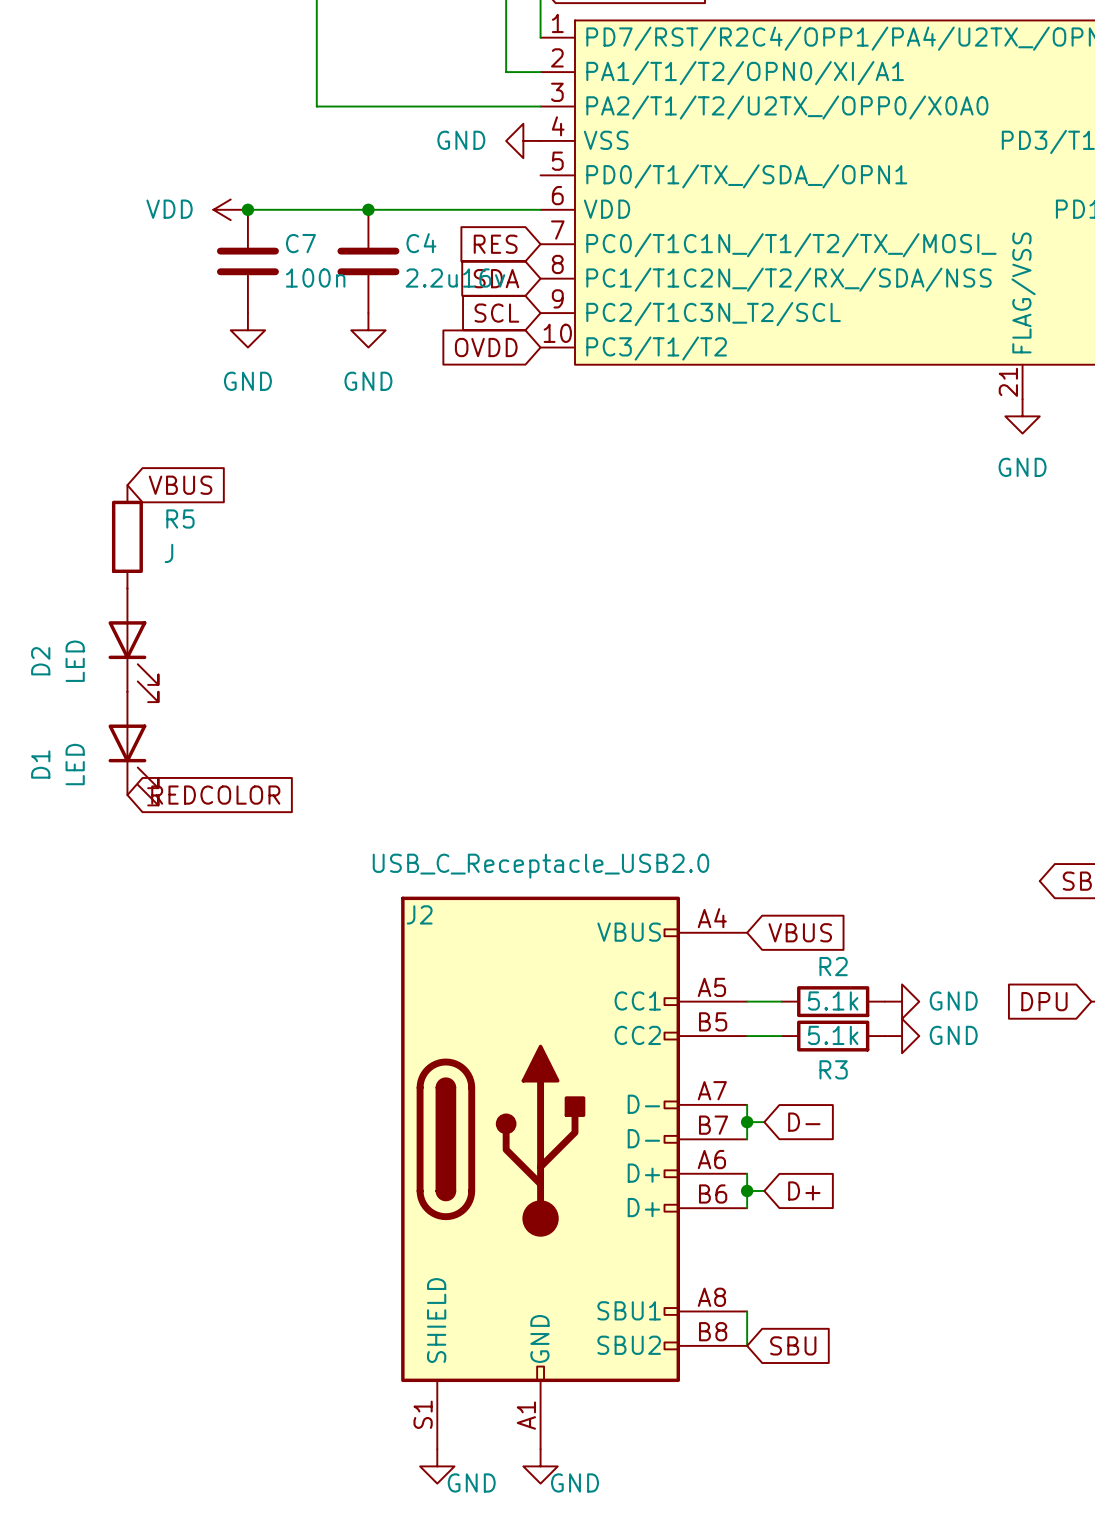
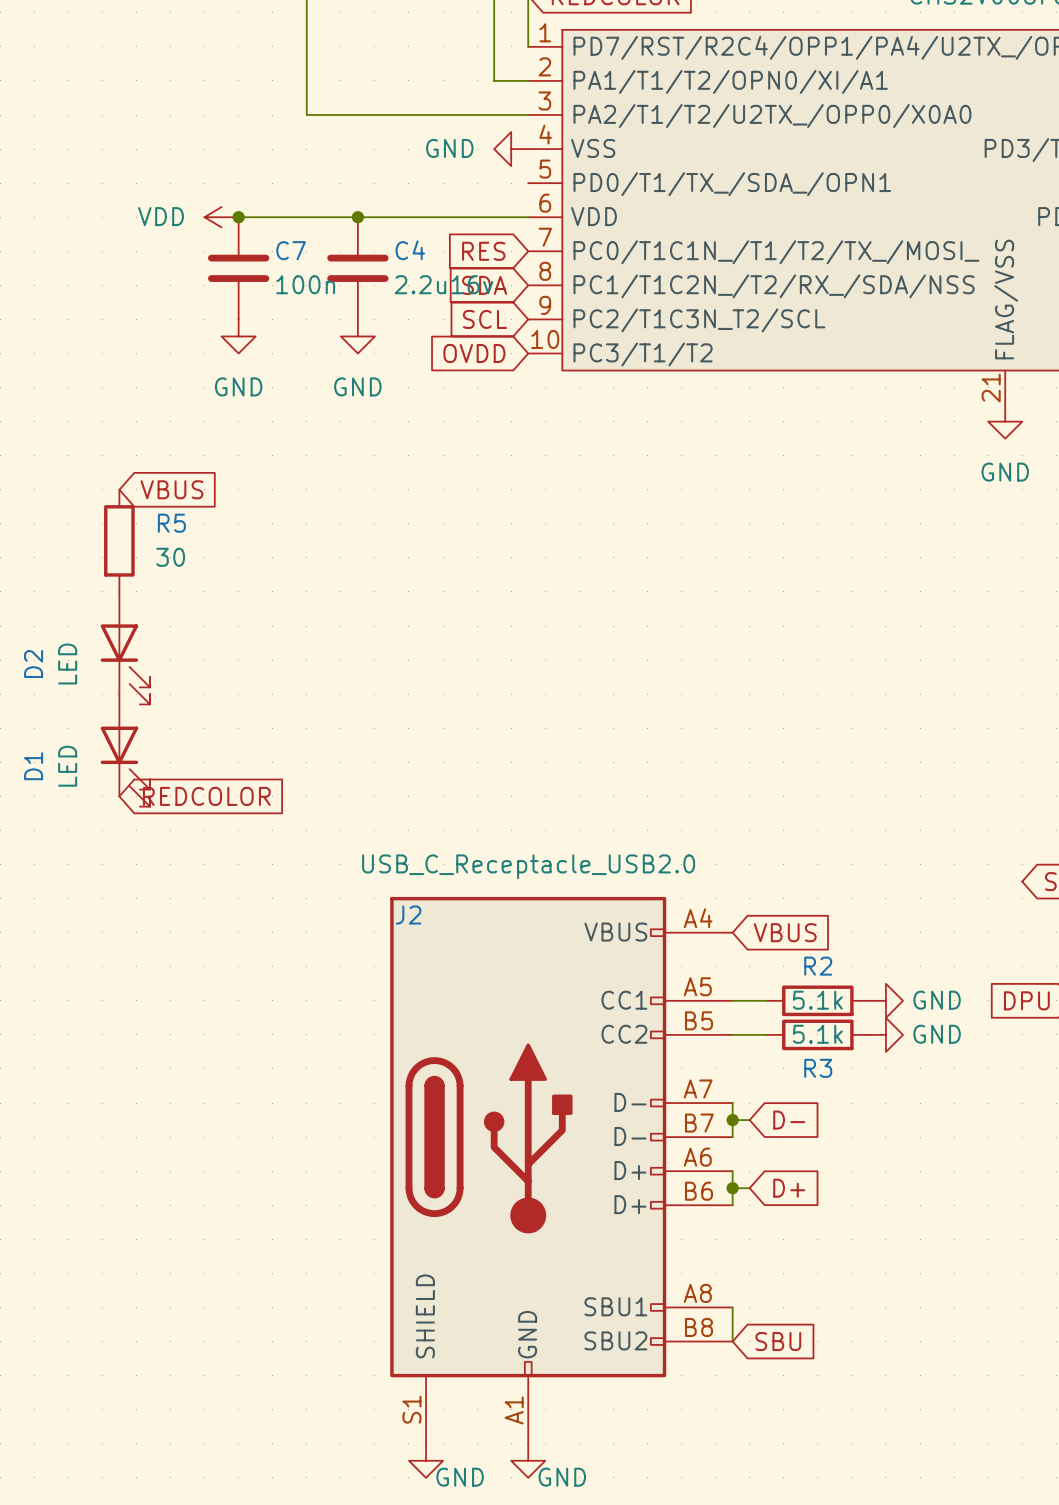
R5 value: J (168, 553) -> 30 (170, 557)

